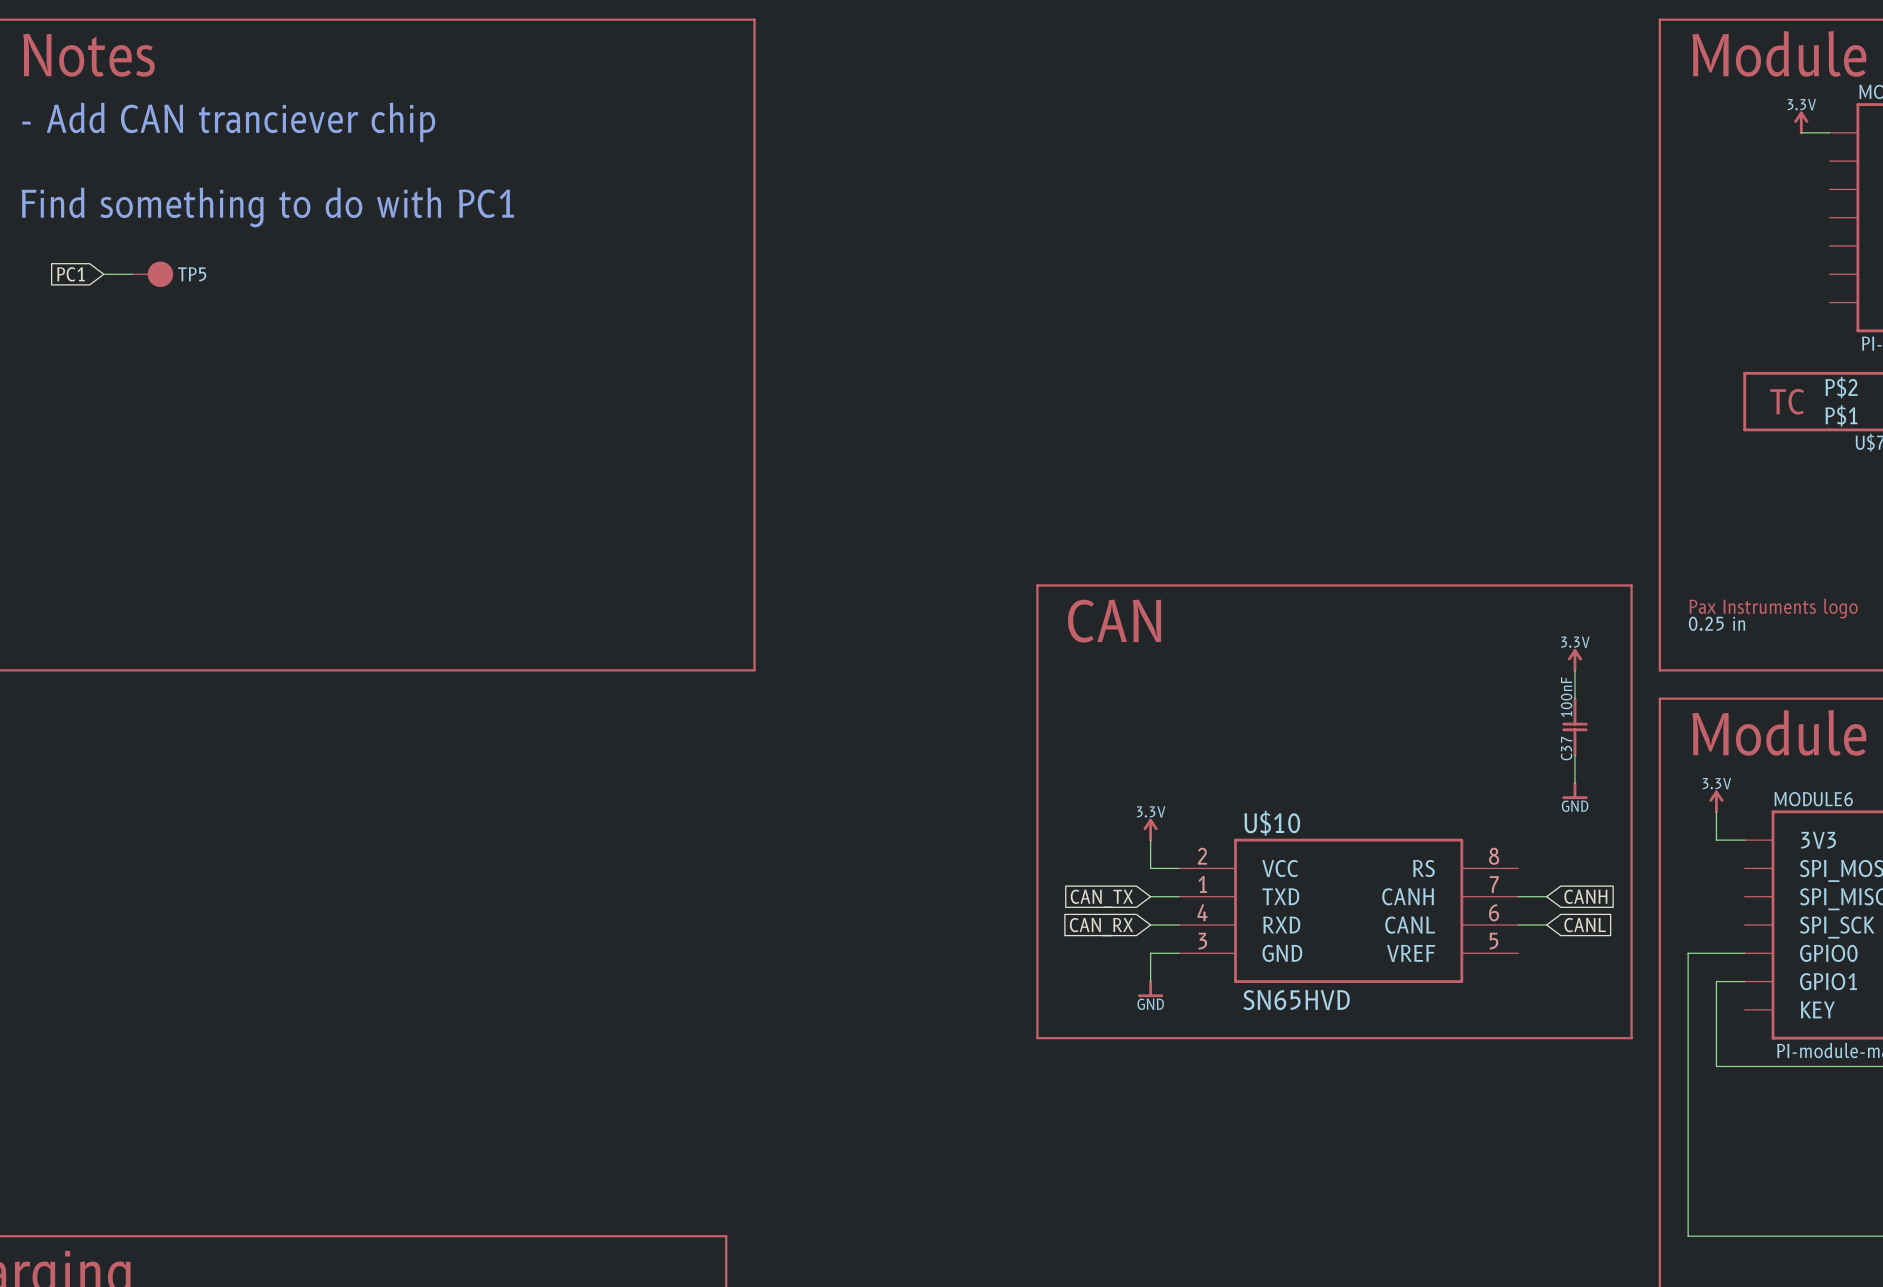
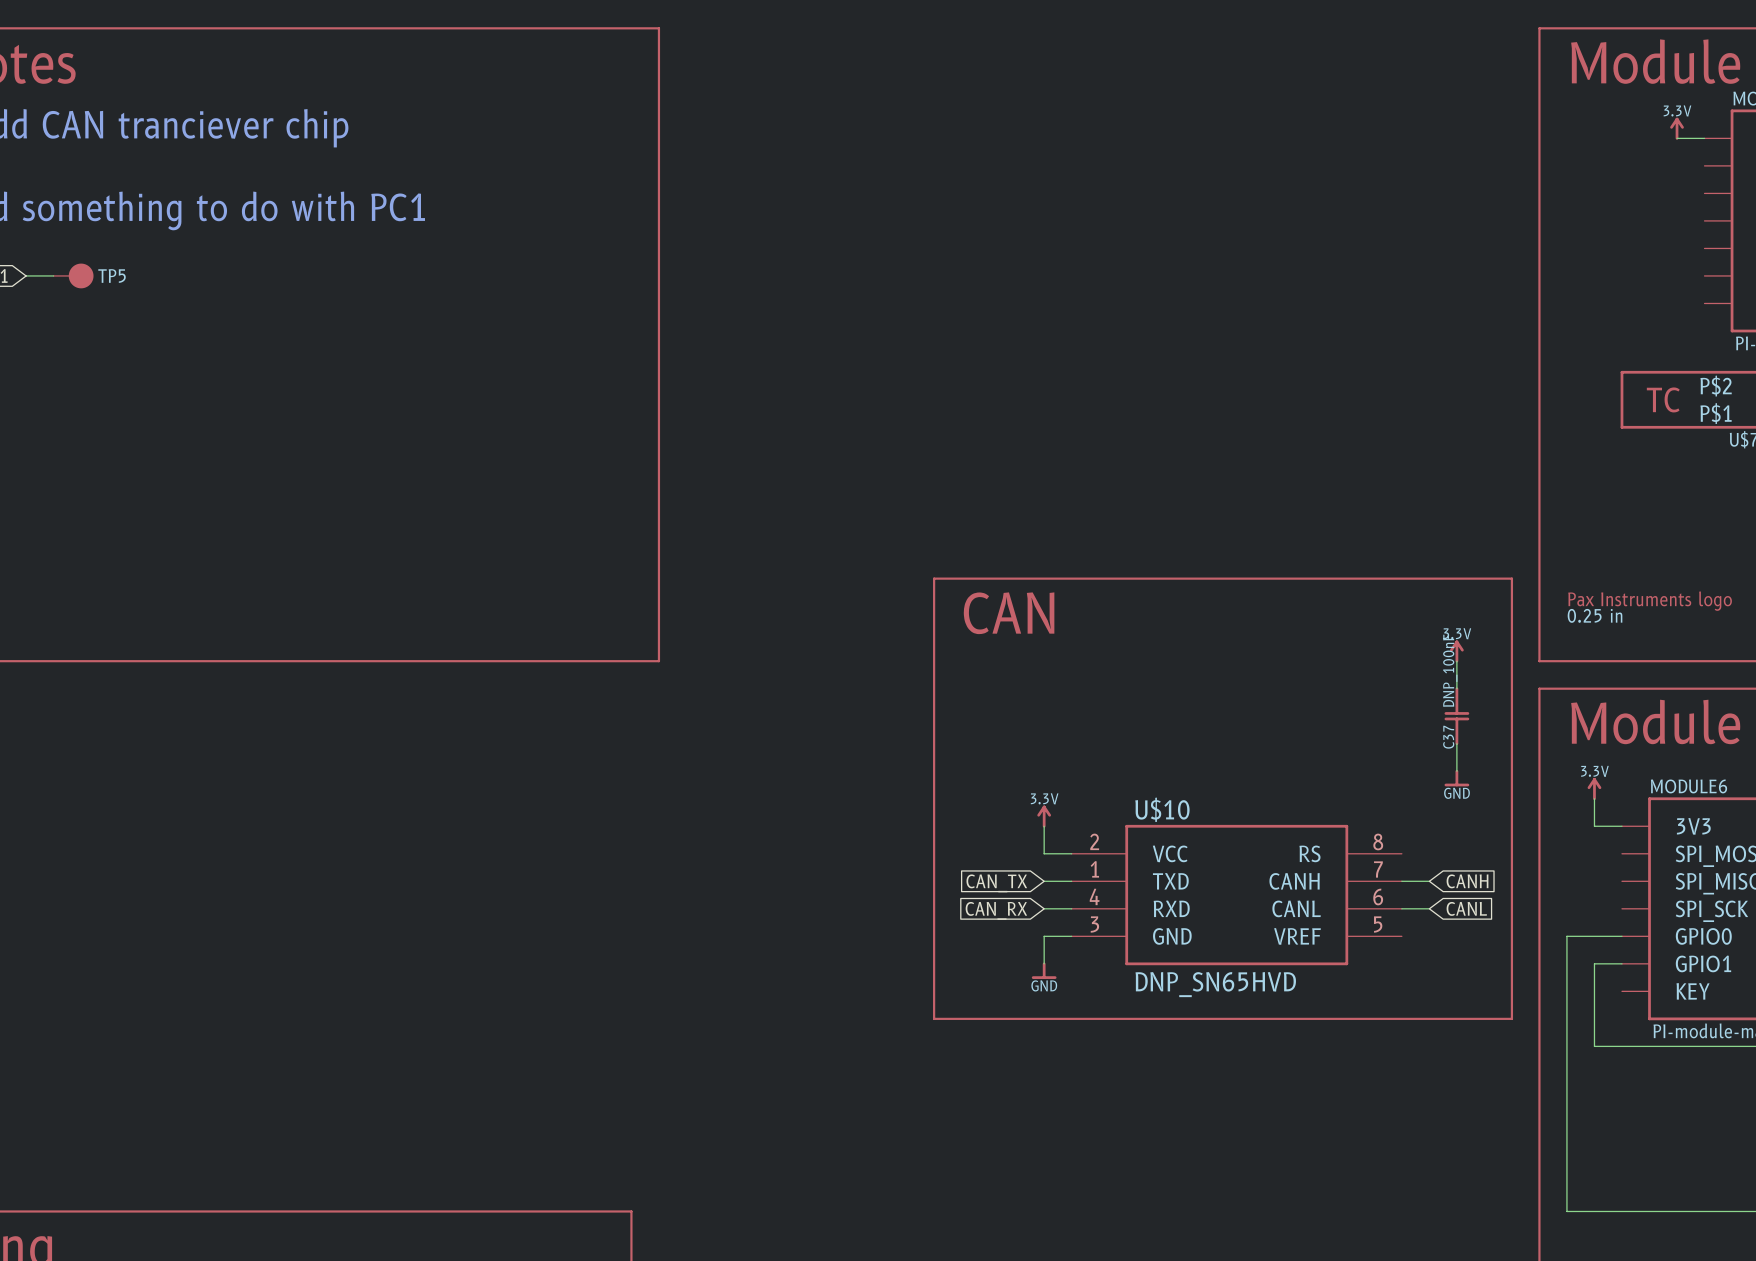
C37 value: 100nF (1566, 697) -> DNP_100nF (1450, 670)
U$10 value: SN65HVD (1296, 1000) -> DNP_SN65HVD (1215, 984)

